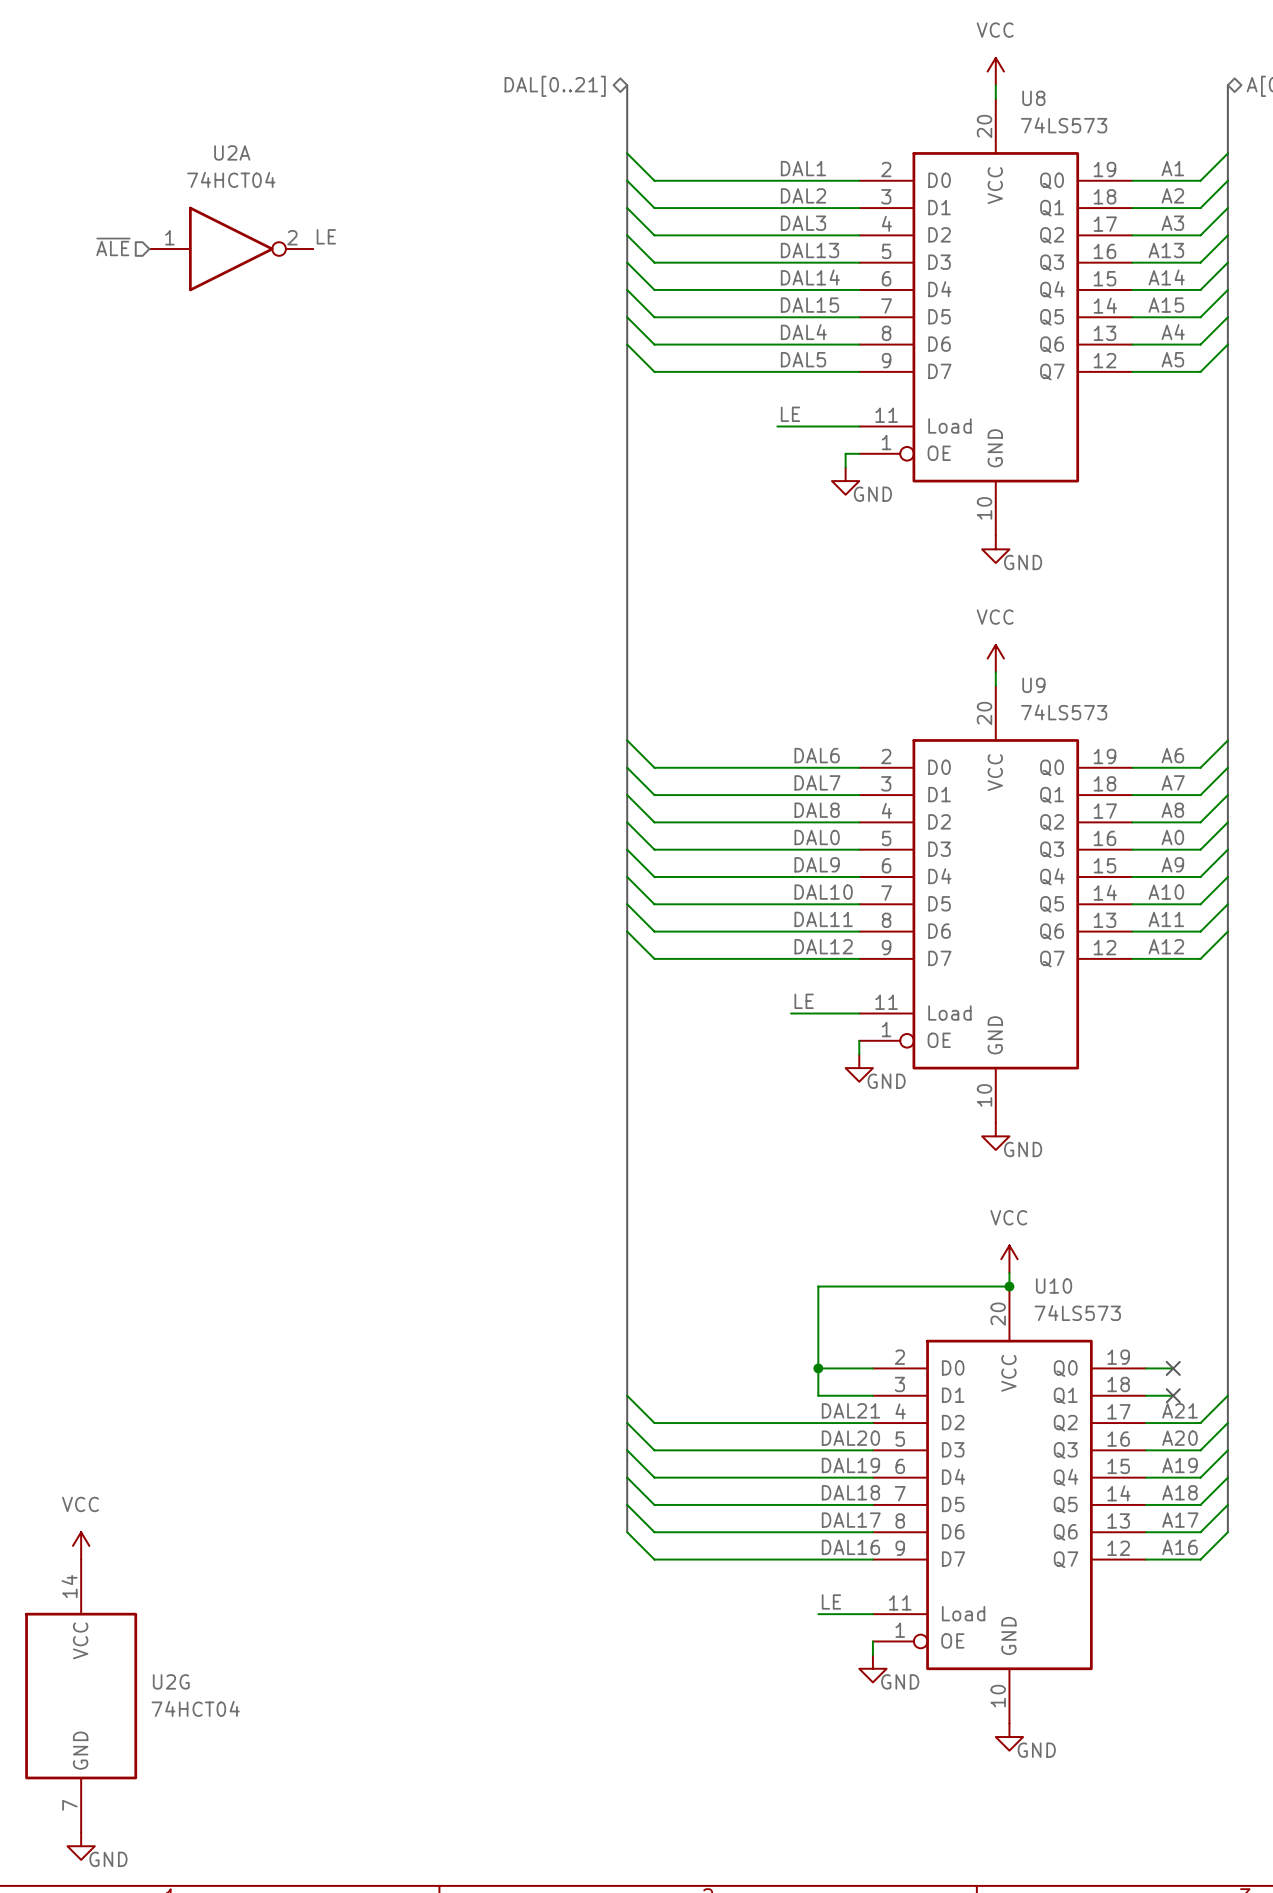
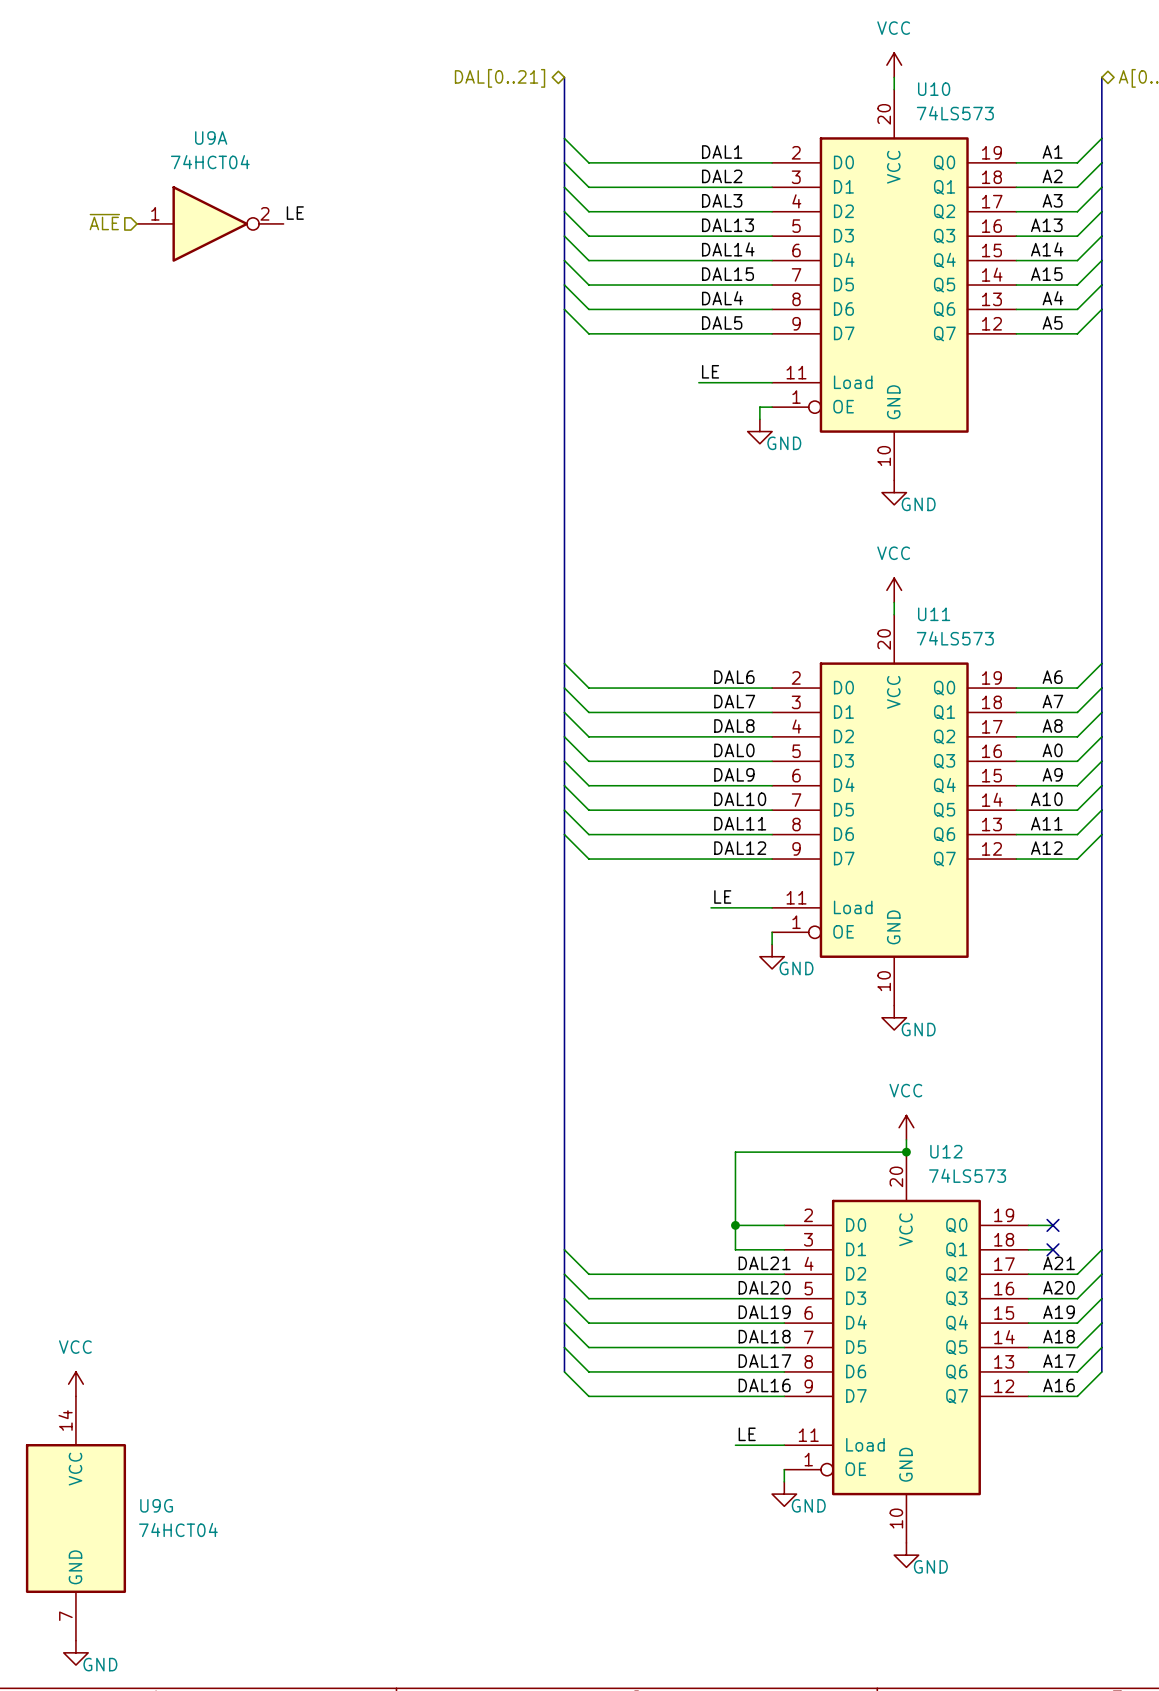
U8 name: U8 (1033, 98) -> U10 (934, 89)
U2A name: U2A (232, 152) -> U9A (211, 137)
U9 name: U9 (1033, 685) -> U11 (934, 614)
U10 name: U10 (1054, 1286) -> U12 (946, 1151)
U2G name: U2G (171, 1681) -> U9G (156, 1505)

